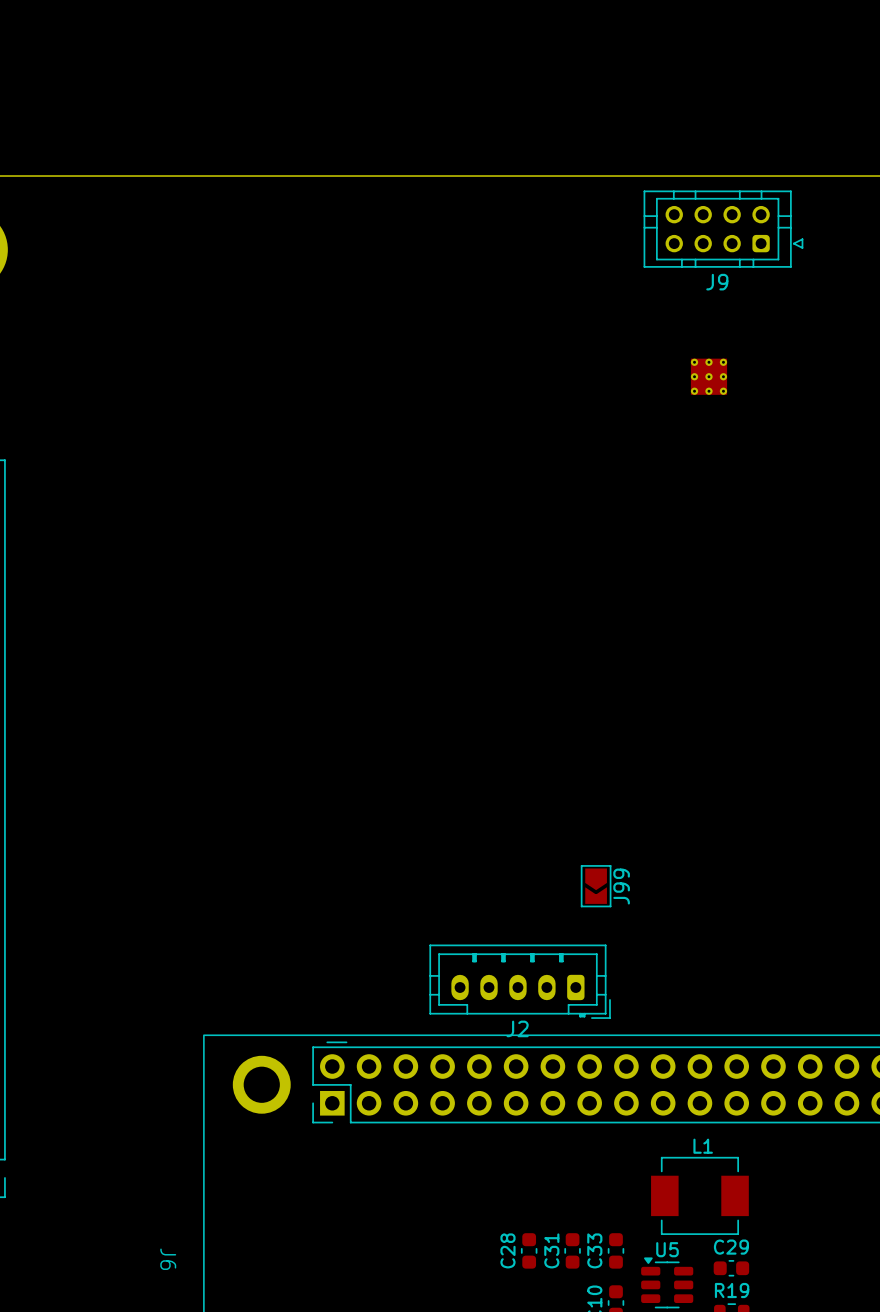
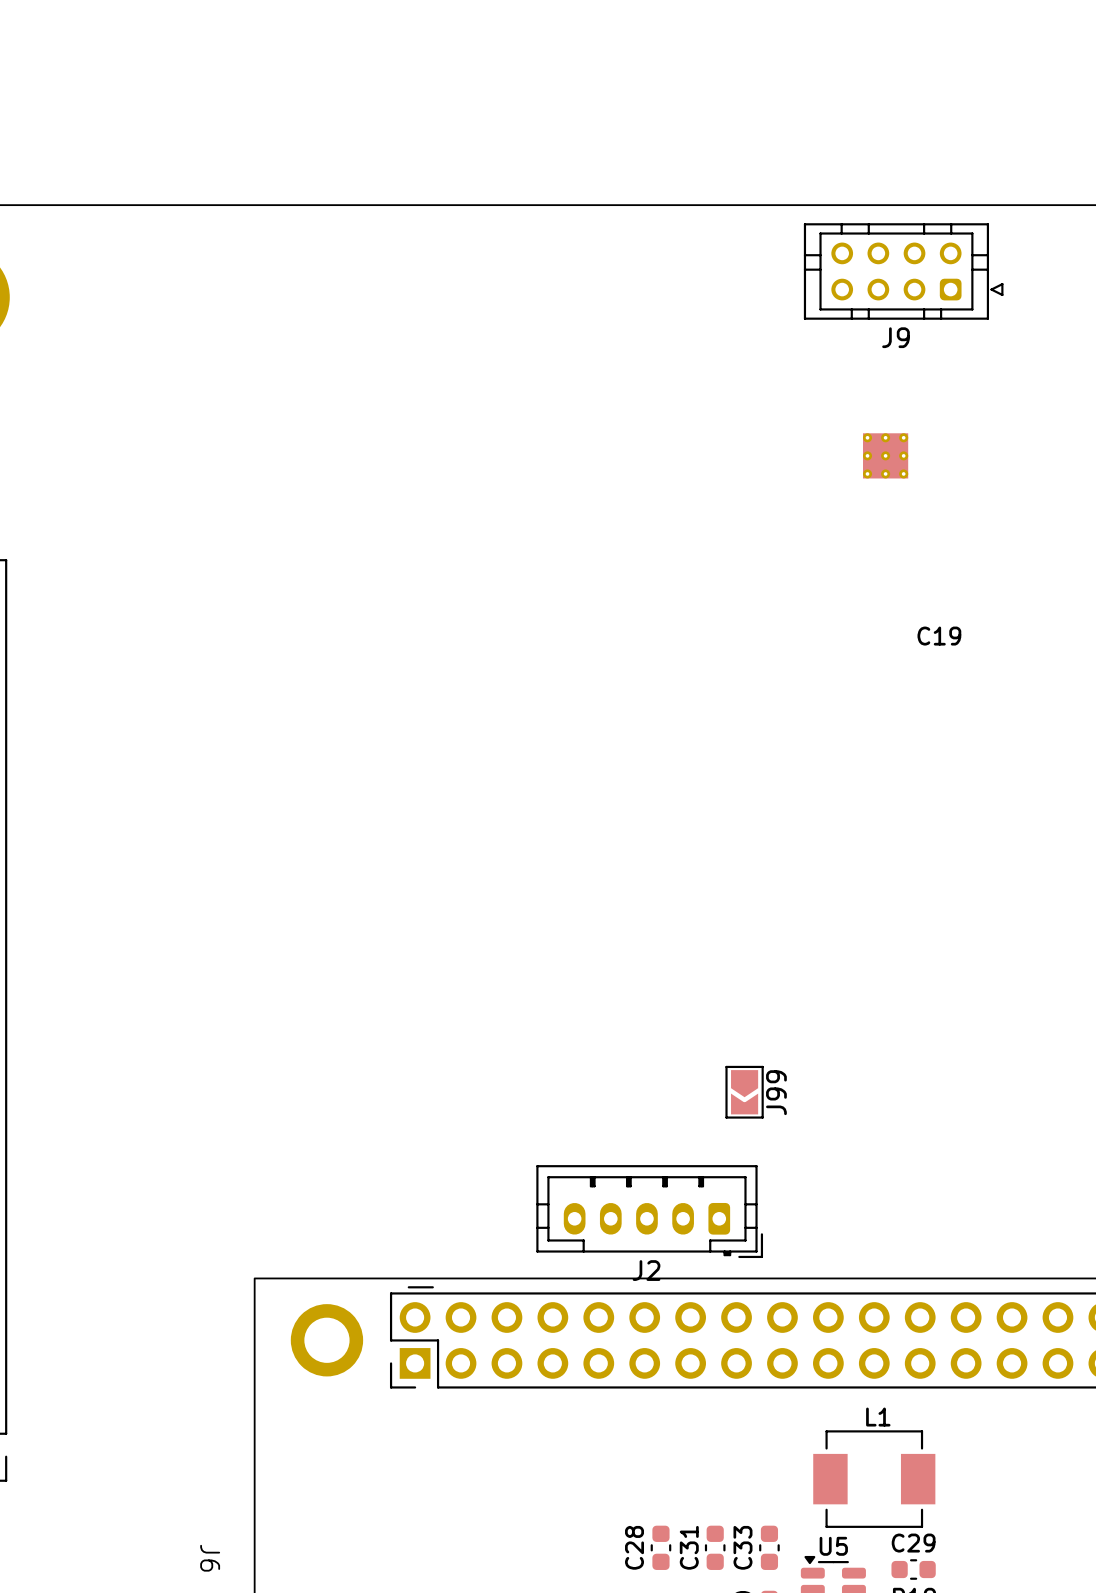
C19: none -> (939, 636)

